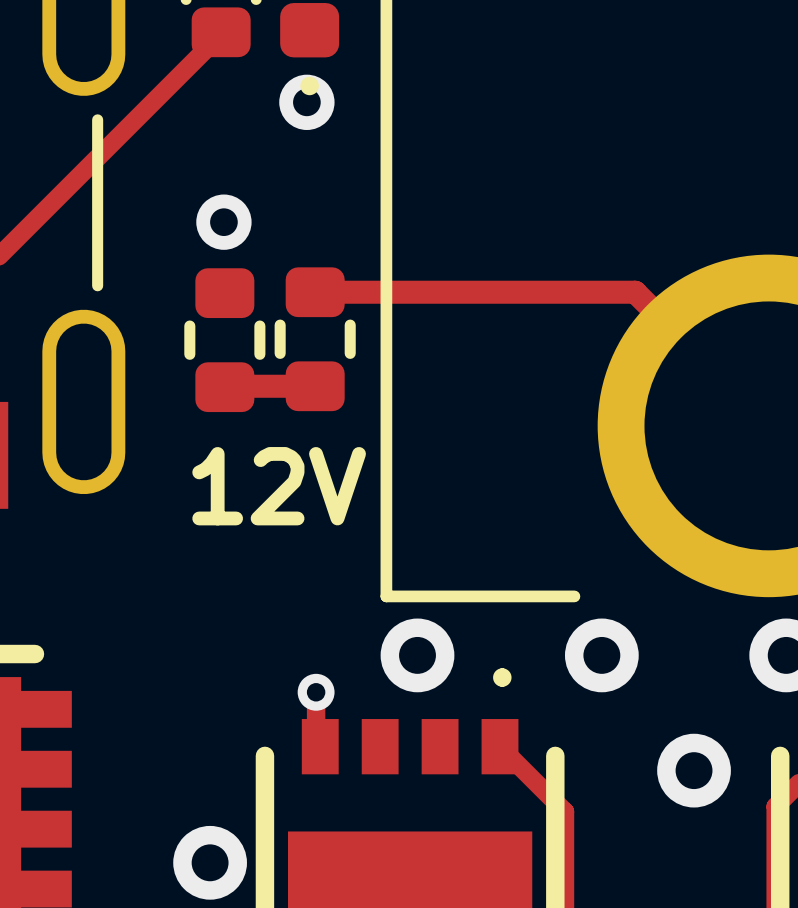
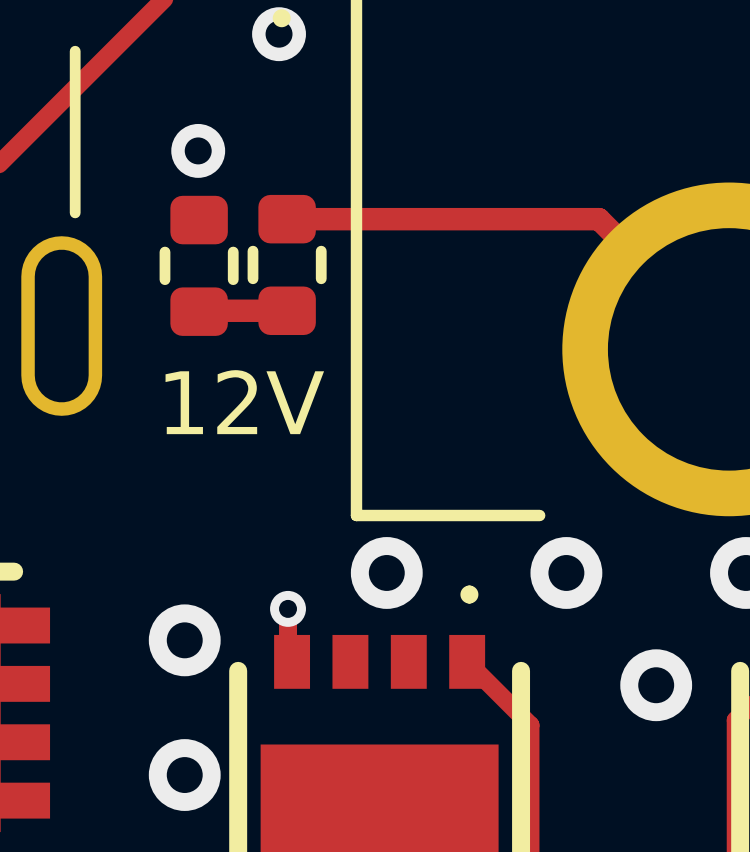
12V name: none -> 12V (244, 402)
text: 12V (279, 486) -> none
via: none -> (184, 640)

